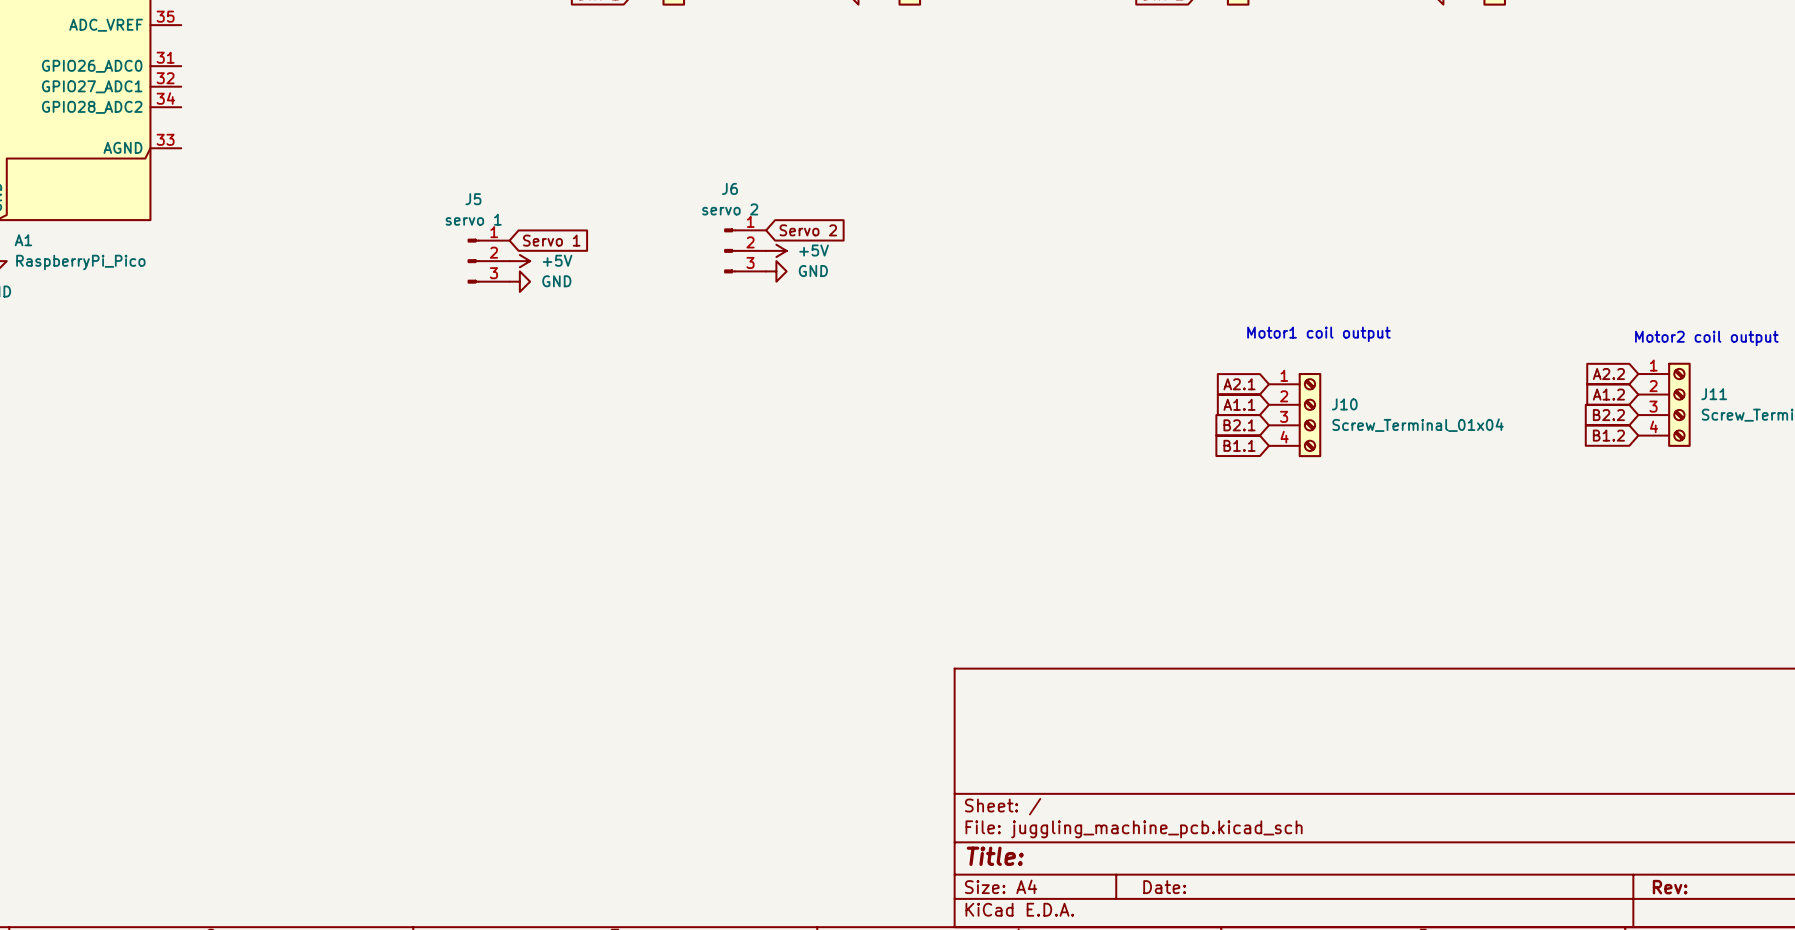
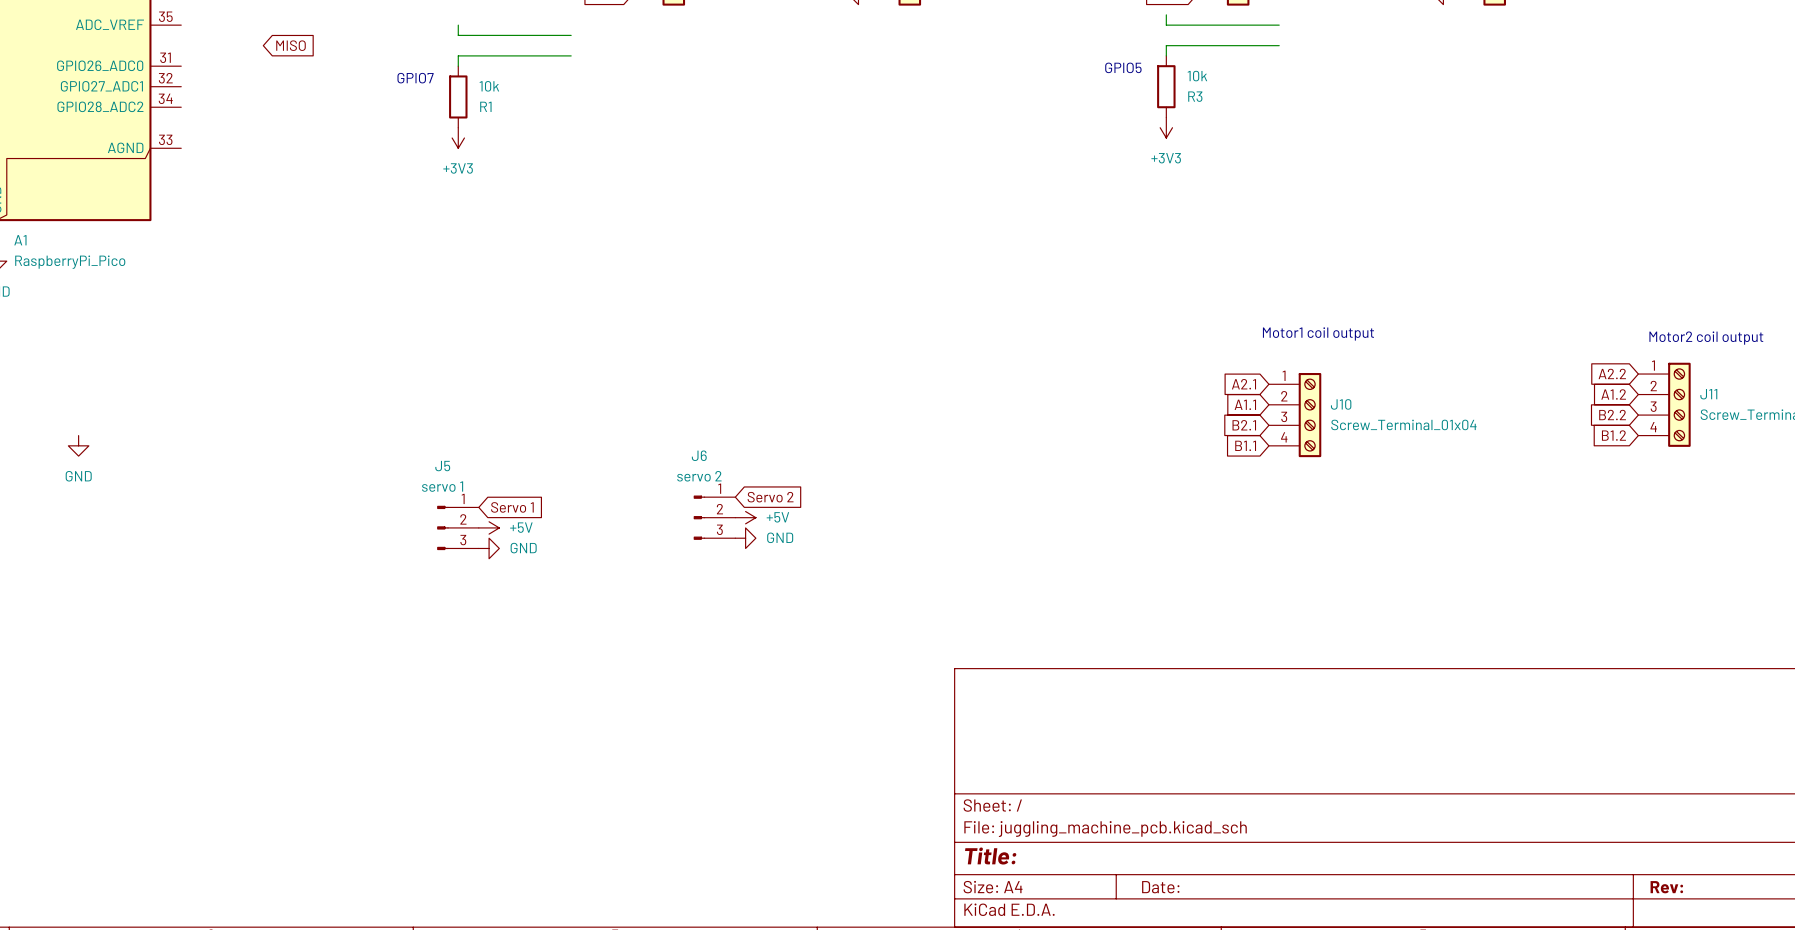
wire: none -> (1166, 14) (1166, 25) (1279, 25)
wire: none -> (458, 25) (458, 35) (571, 35)
global label: none -> MISO (291, 45)
wire: none -> (1279, 45) (1166, 45) (1166, 55)
wire: none -> (571, 55) (458, 55) (458, 66)
text: none -> GPIO5 (1123, 67)
text: none -> GPIO7 (415, 78)
R3: none -> 10k (1166, 86)
R1: none -> 10k (458, 96)
power symbol: none -> +3V3 (1166, 127)
power symbol: none -> +3V3 (458, 138)
global label: Servo 2 (808, 230) -> none
global label: Servo 1 (551, 240) -> none
J6 position: (745, 250) -> (714, 517)
power symbol: +5V (776, 250) -> none
J5 position: (488, 261) -> (457, 527)
power symbol: +5V (519, 261) -> none
power symbol: GND (776, 271) -> none
power symbol: GND (519, 281) -> none
power symbol: none -> GND (78, 445)
global label: none -> Servo 2 (770, 497)
global label: none -> Servo 1 (512, 507)
power symbol: none -> +5V (745, 517)
power symbol: none -> +5V (489, 527)
power symbol: none -> GND (745, 538)
power symbol: none -> GND (489, 548)

